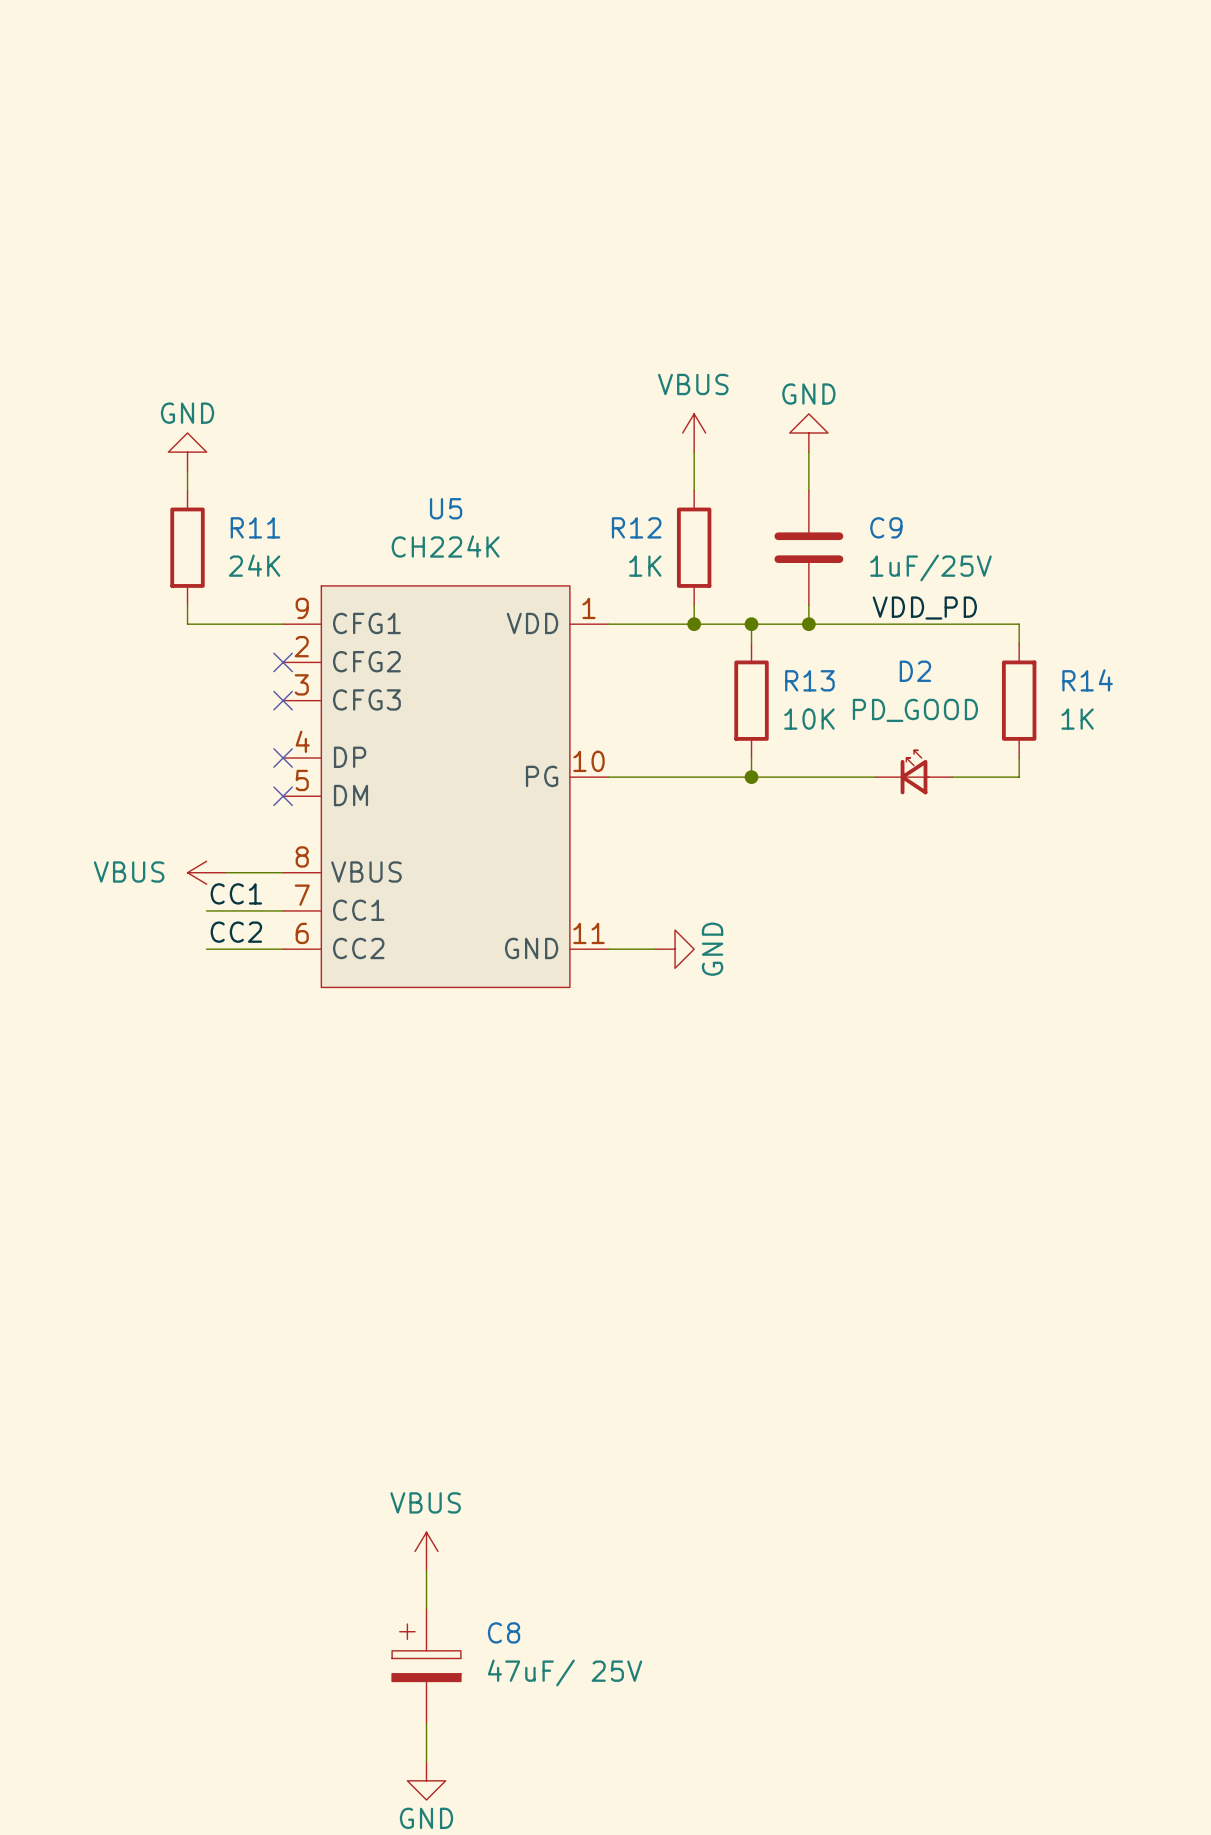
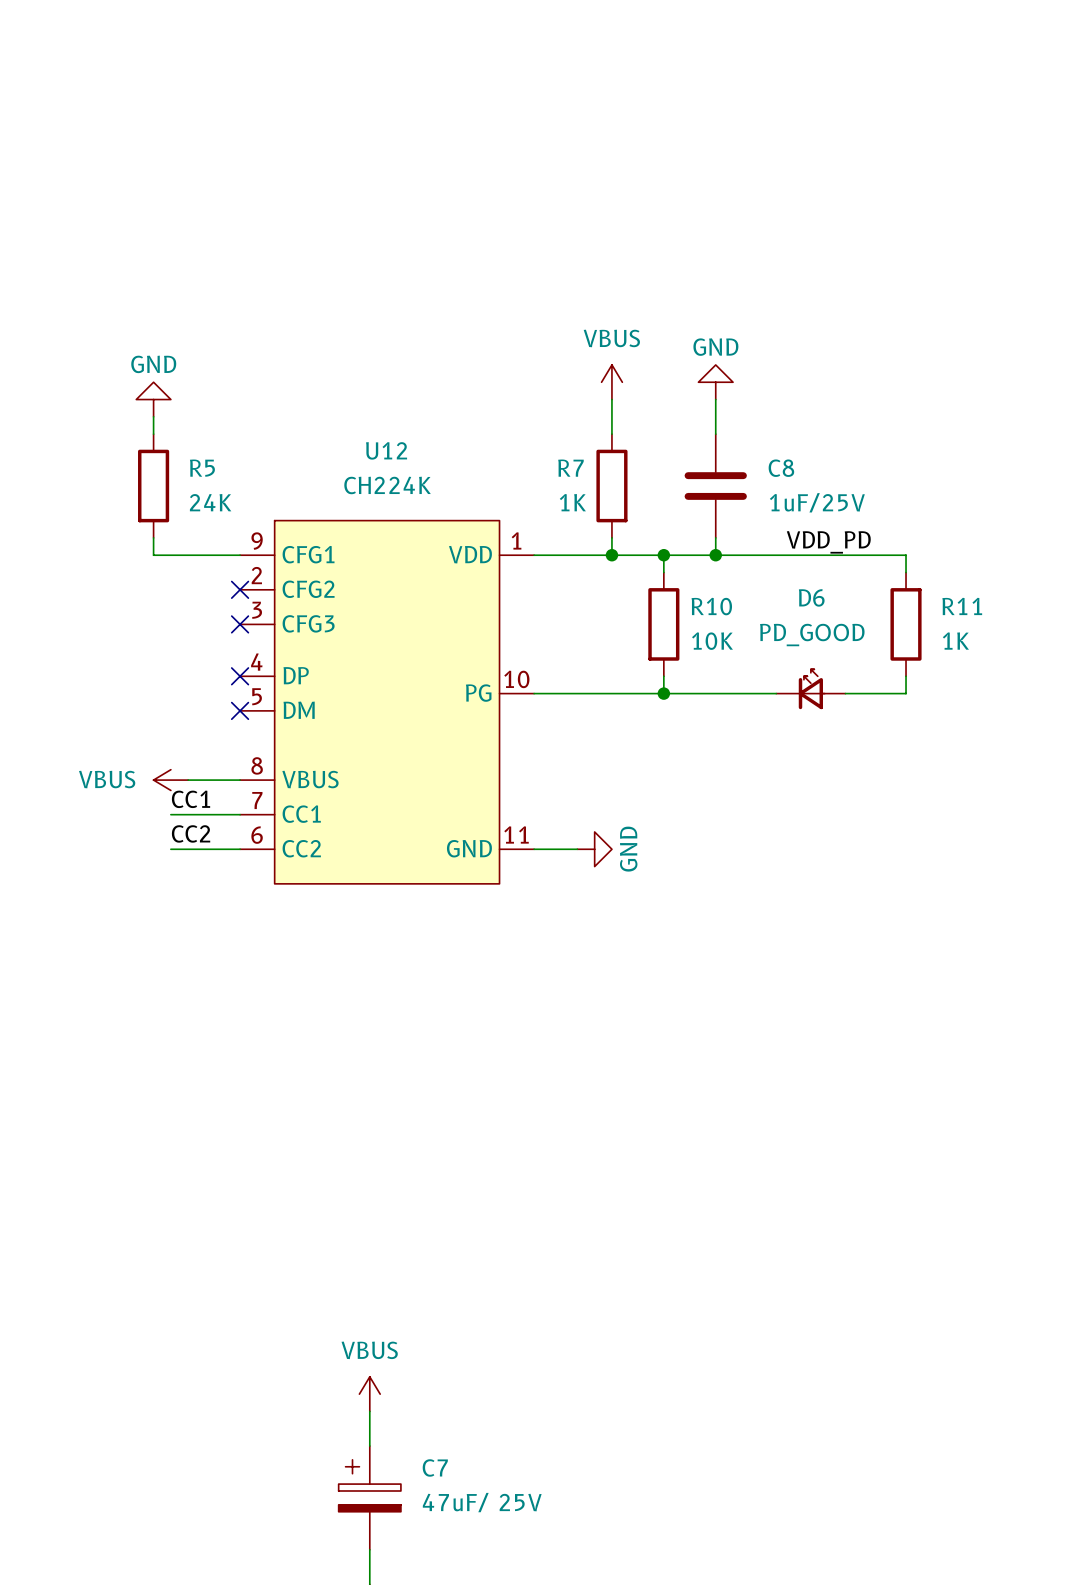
U5 name: U5 (446, 508) -> U12 (386, 450)
R11 name: R11 (255, 527) -> R5 (202, 468)
R12 name: R12 (636, 527) -> R7 (570, 468)
C9 name: C9 (886, 527) -> C8 (781, 468)
D2 name: D2 (915, 671) -> D6 (811, 597)
R13 name: R13 (809, 680) -> R10 (711, 606)
R14 name: R14 (1087, 680) -> R11 (962, 606)
C8 name: C8 (504, 1632) -> C7 (435, 1467)

